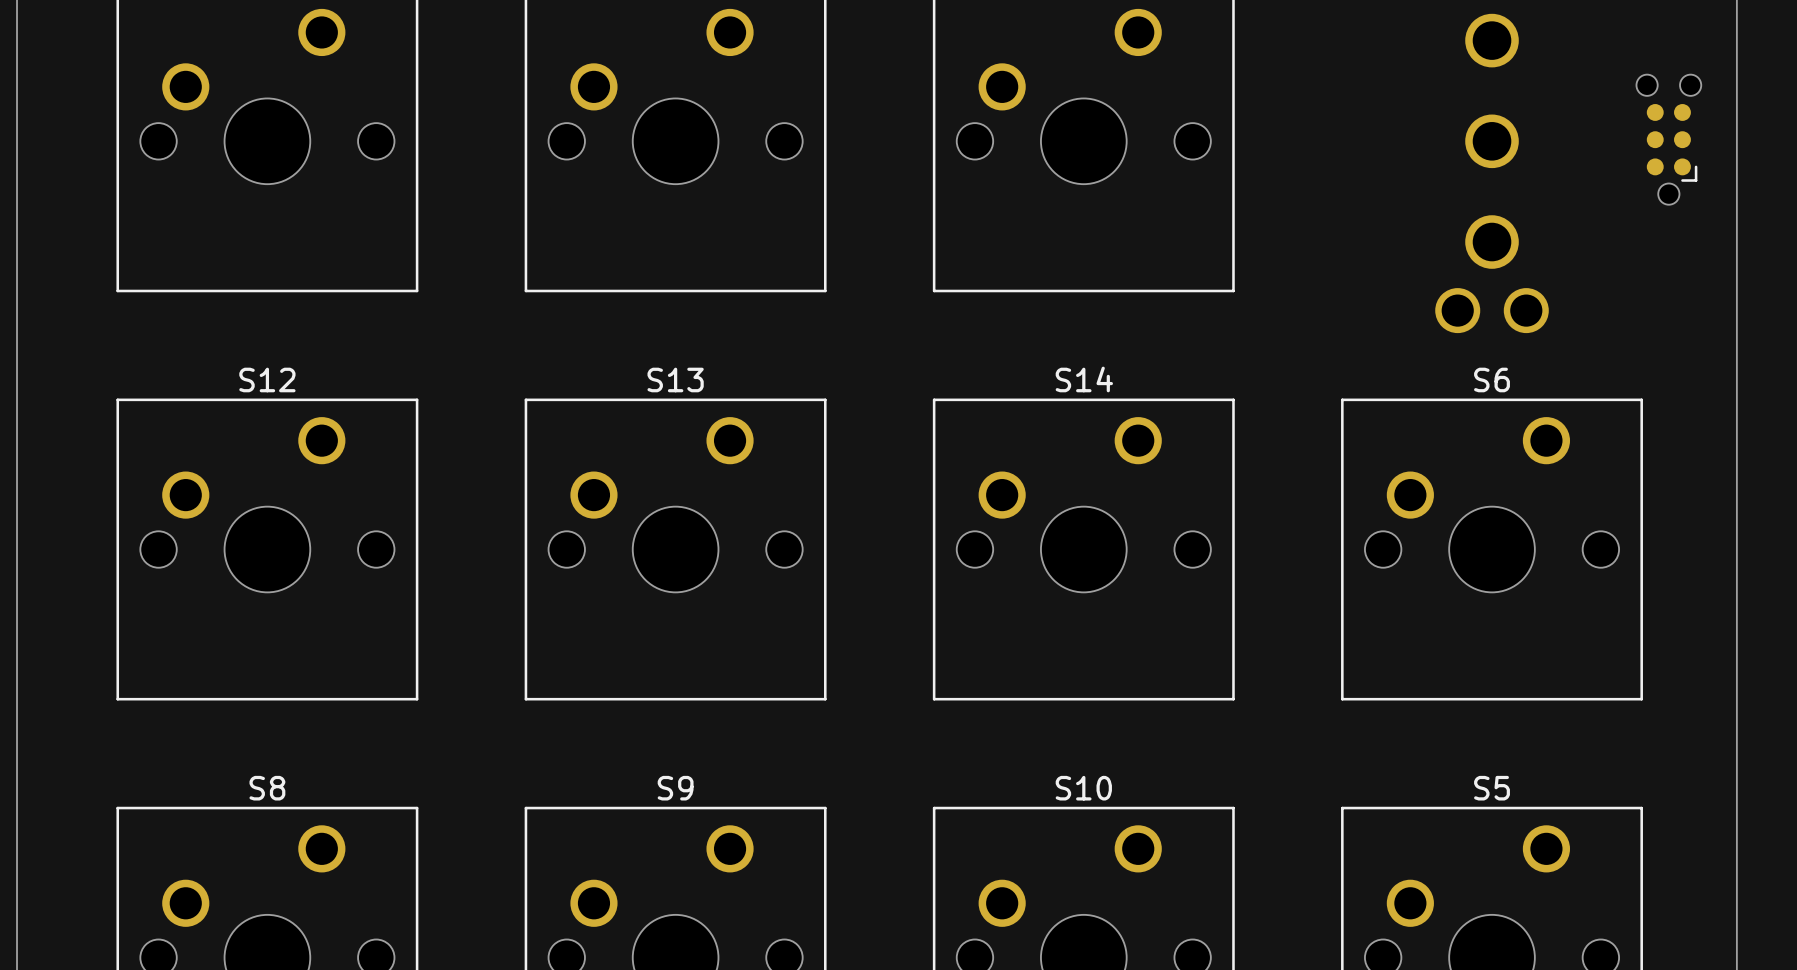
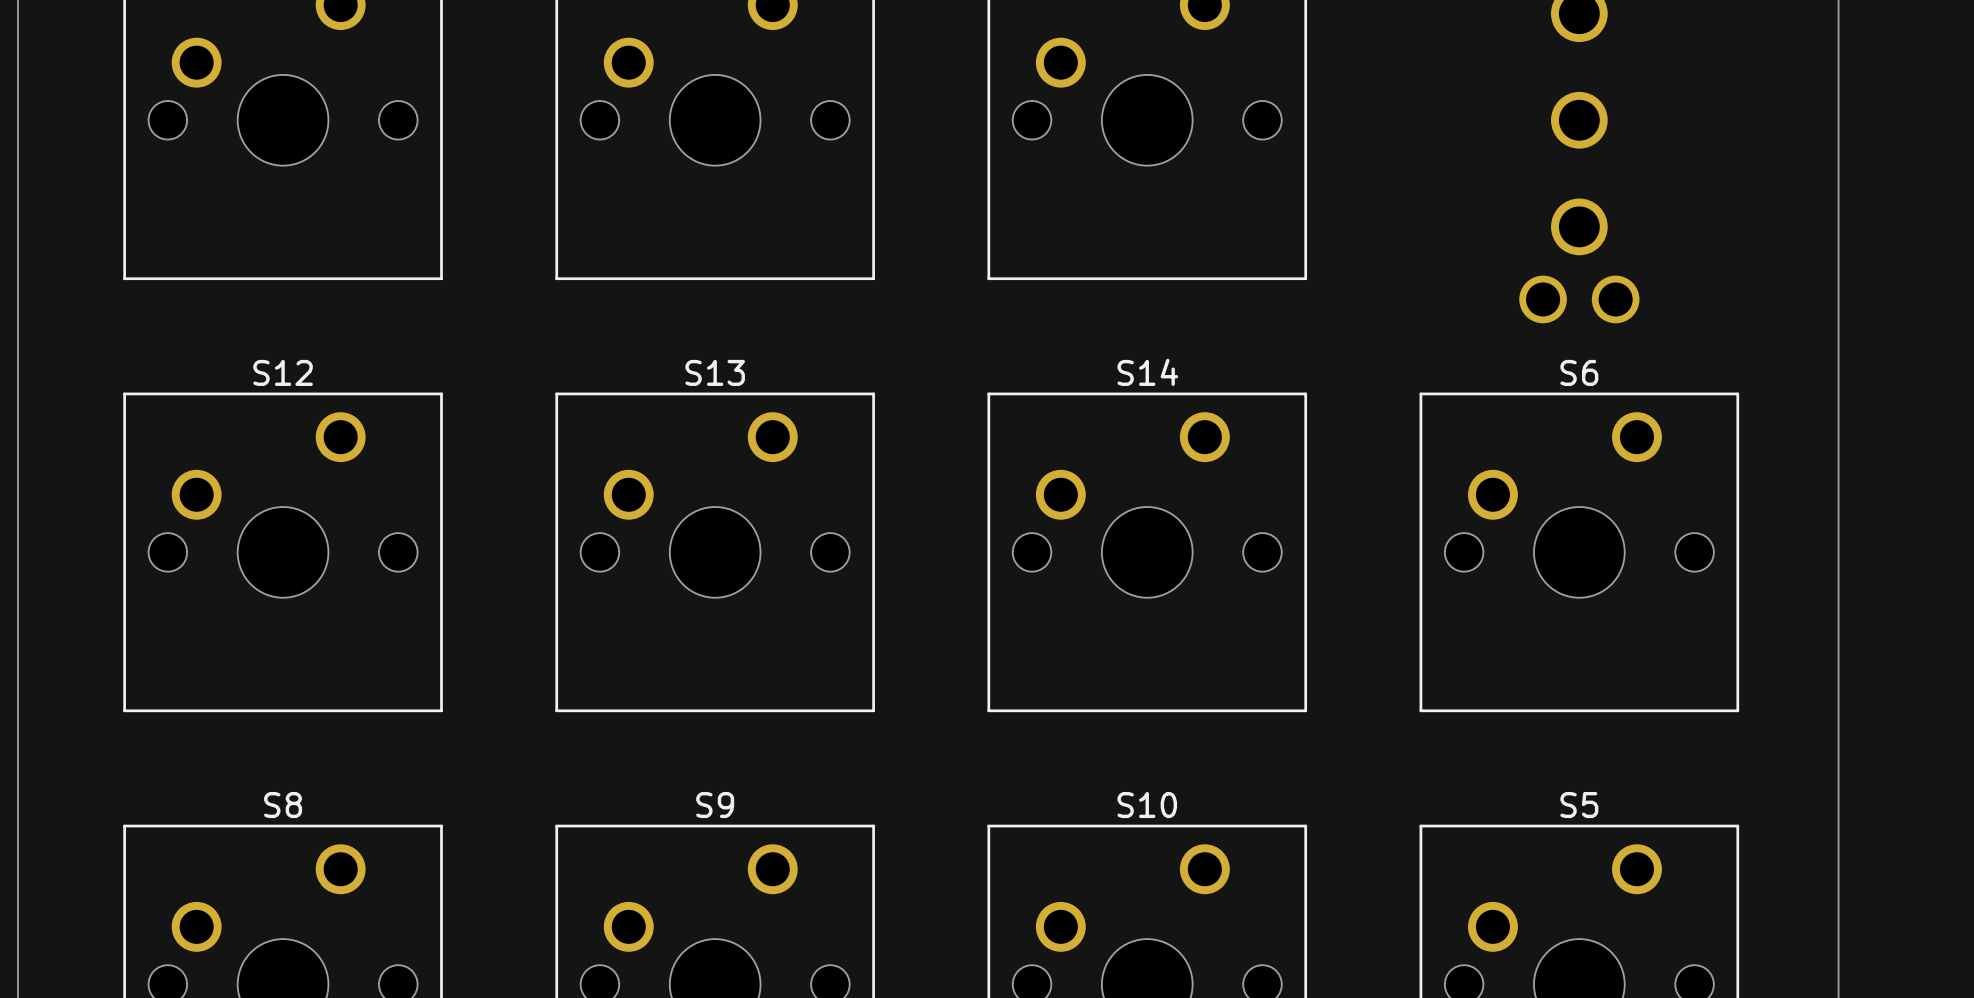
part: (1668, 139) -> none

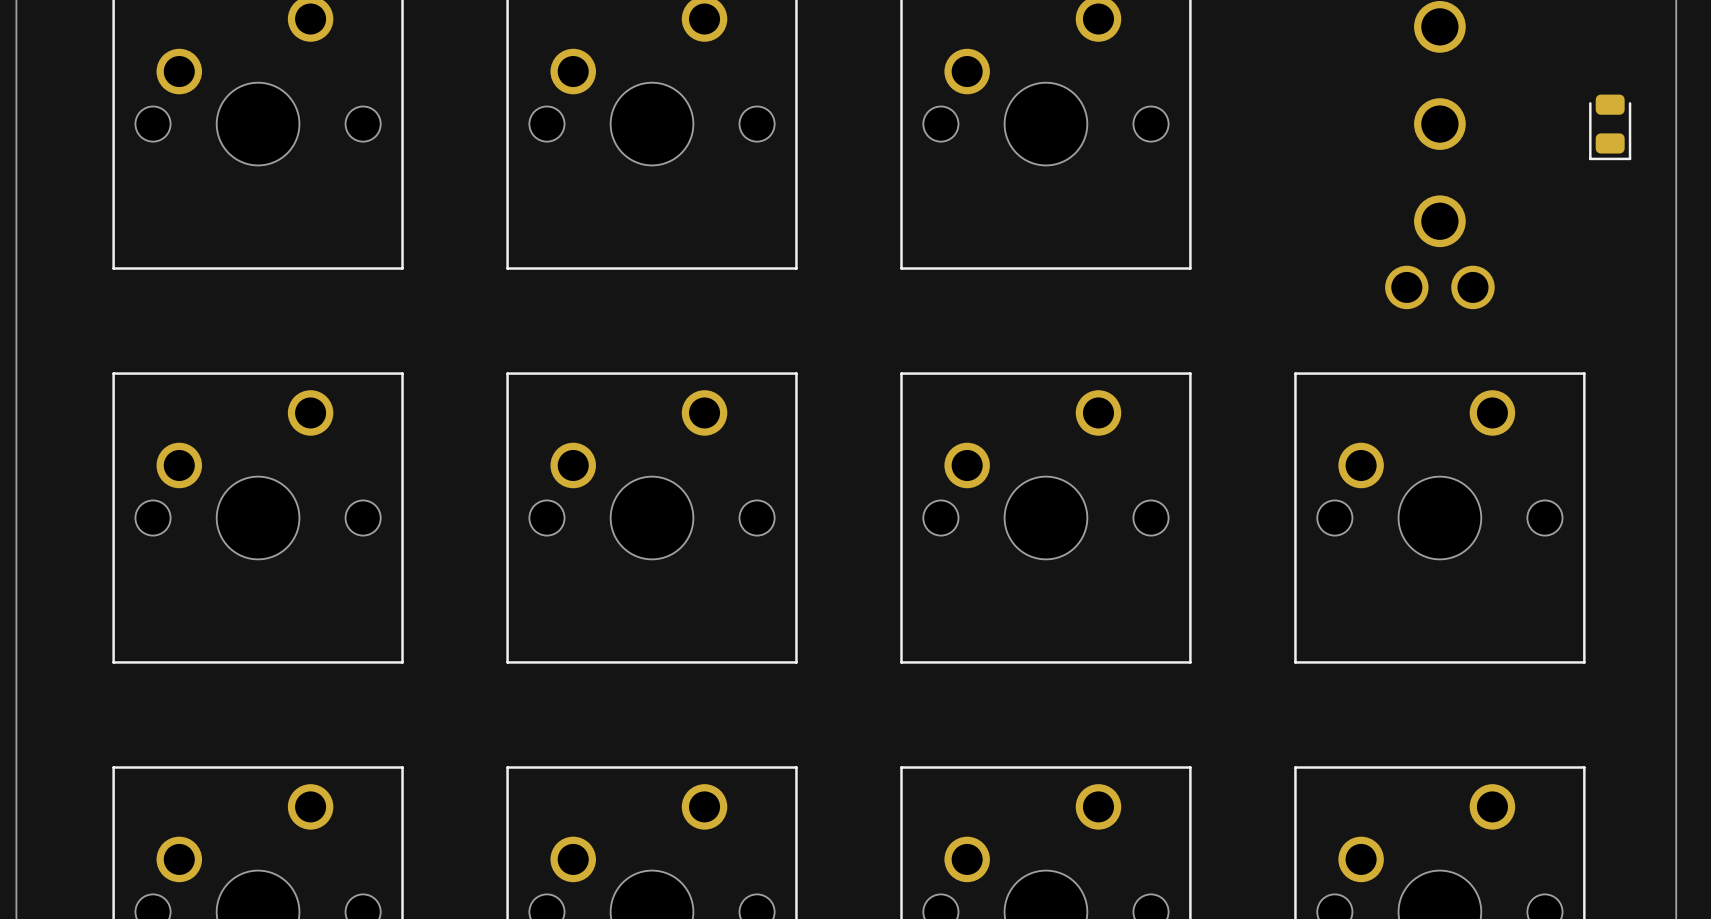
part: none -> (1610, 127)
S12 name: S12 (283, 372) -> none
S13 name: S13 (715, 372) -> none
S14 name: S14 (1147, 372) -> none
S6 name: S6 (1579, 372) -> none
S8 name: S8 (283, 805) -> none
S9 name: S9 (715, 805) -> none
S10 name: S10 (1147, 805) -> none
S5 name: S5 (1579, 805) -> none

